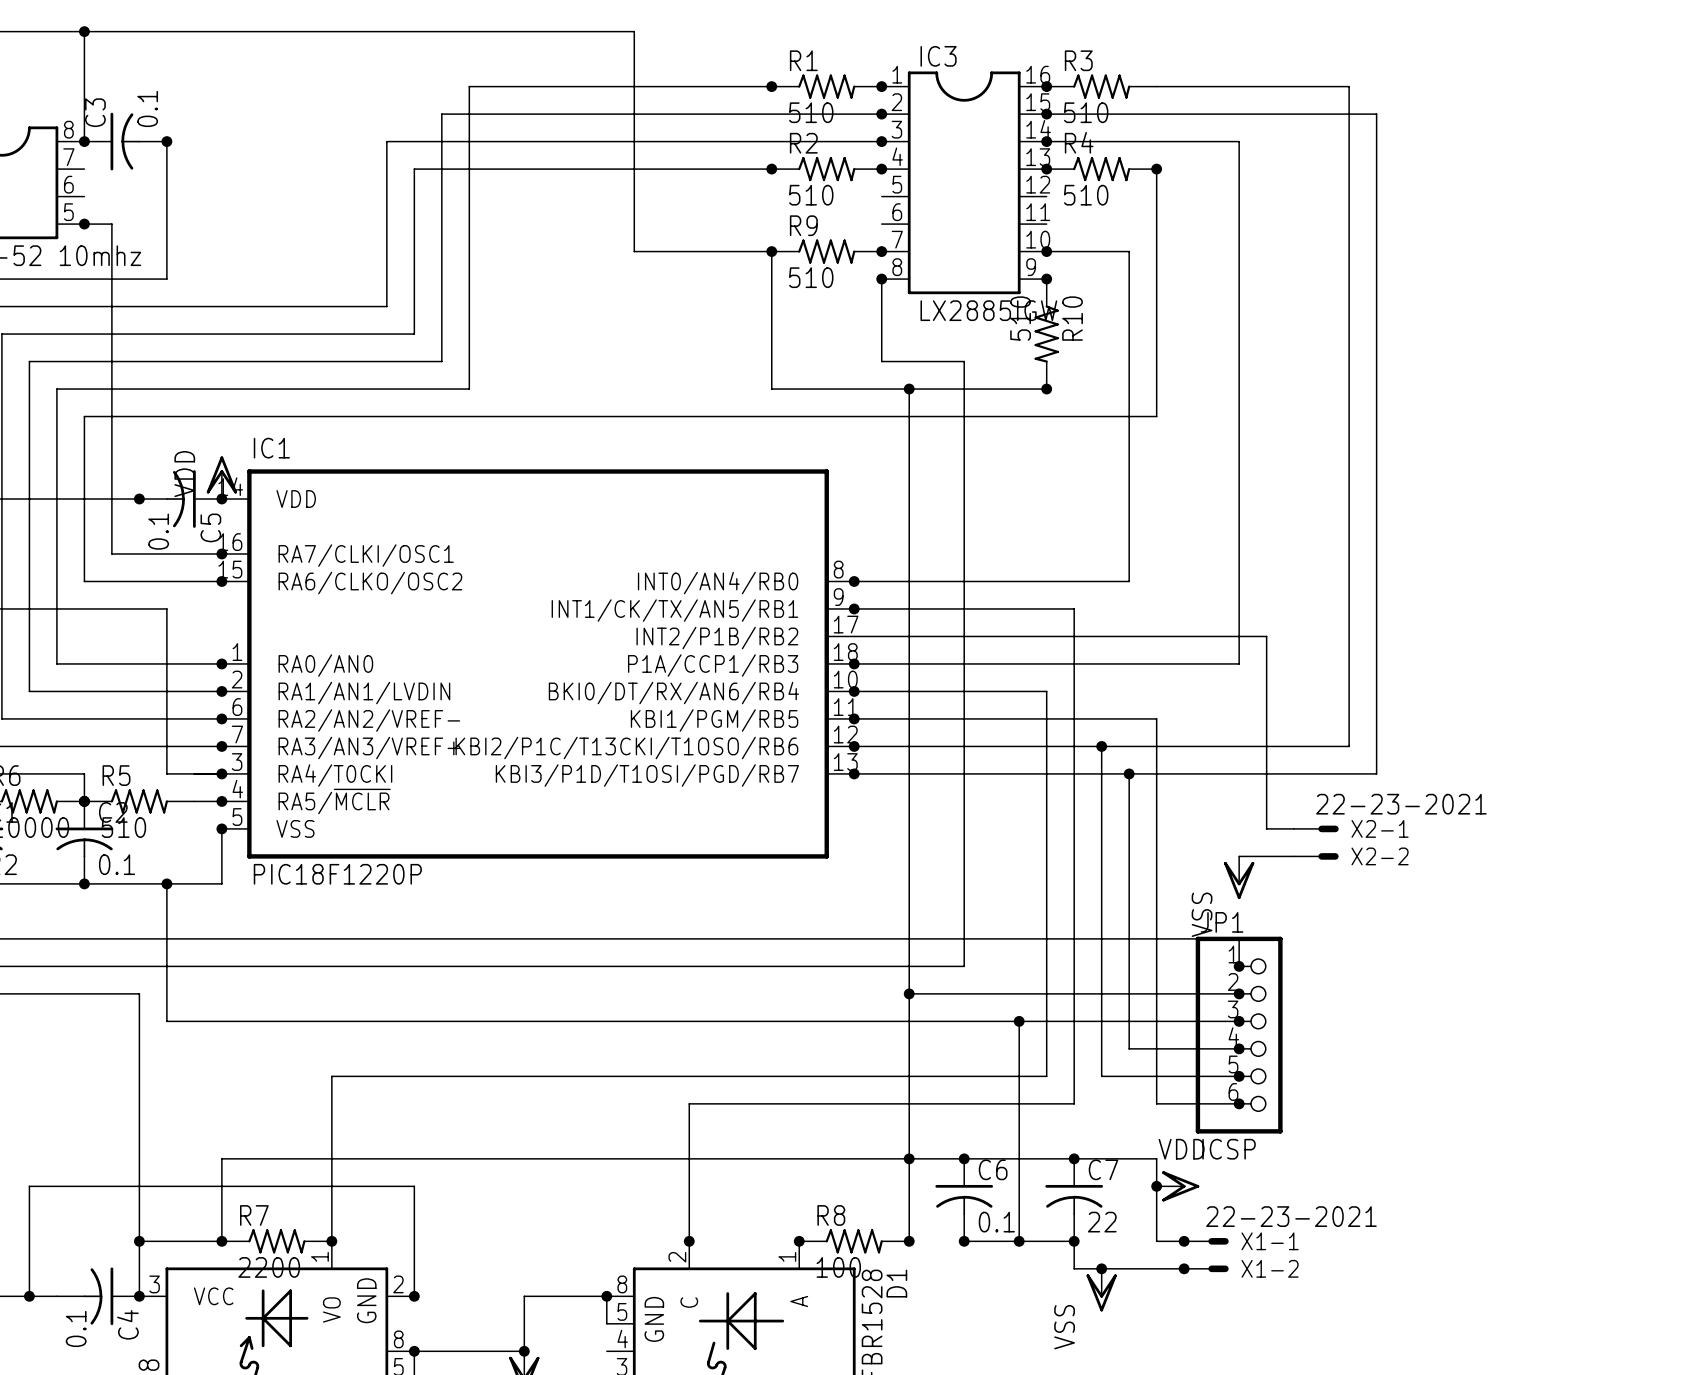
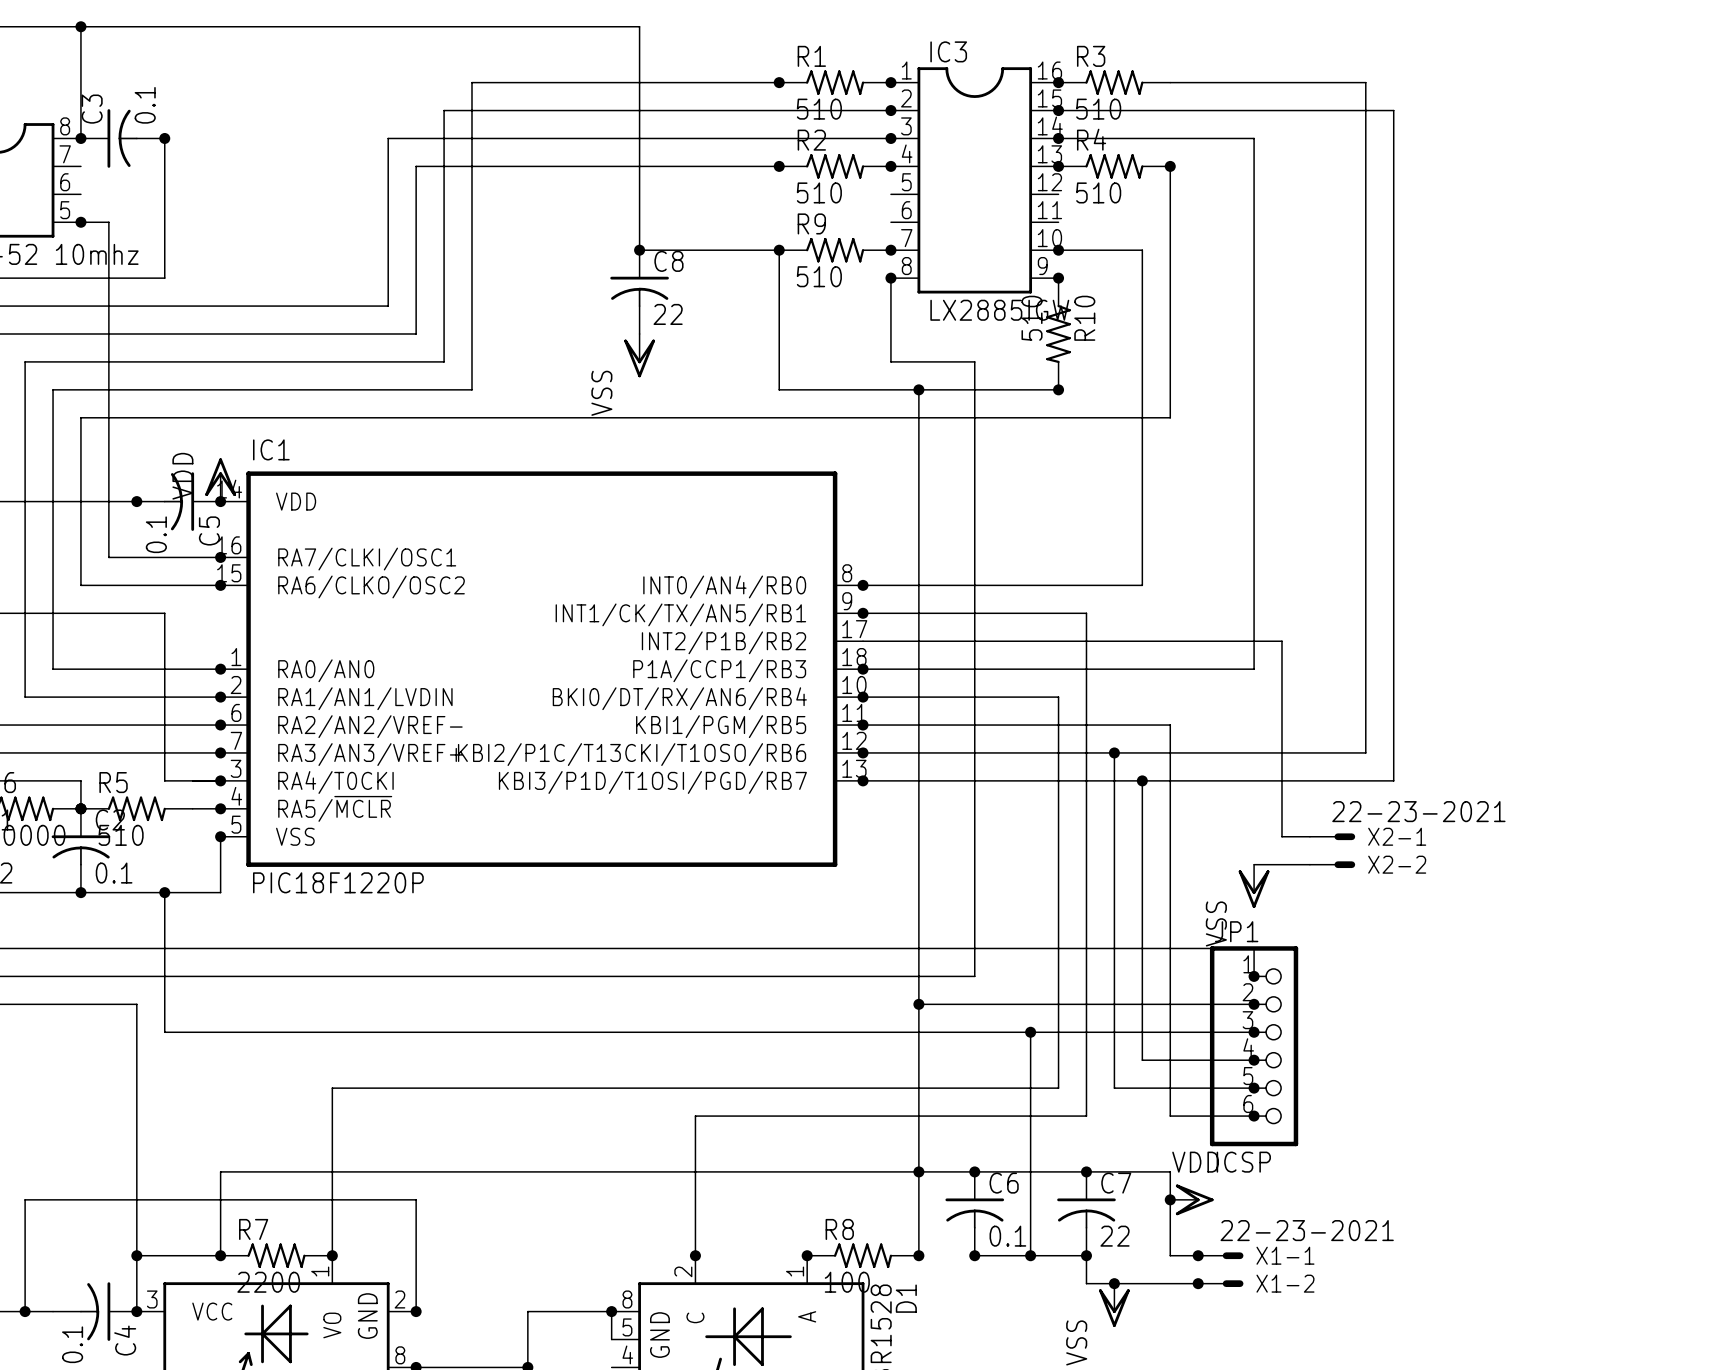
junction: none -> (639, 250)
C8: none -> 22 (639, 292)
power symbol: none -> VSS (639, 355)

